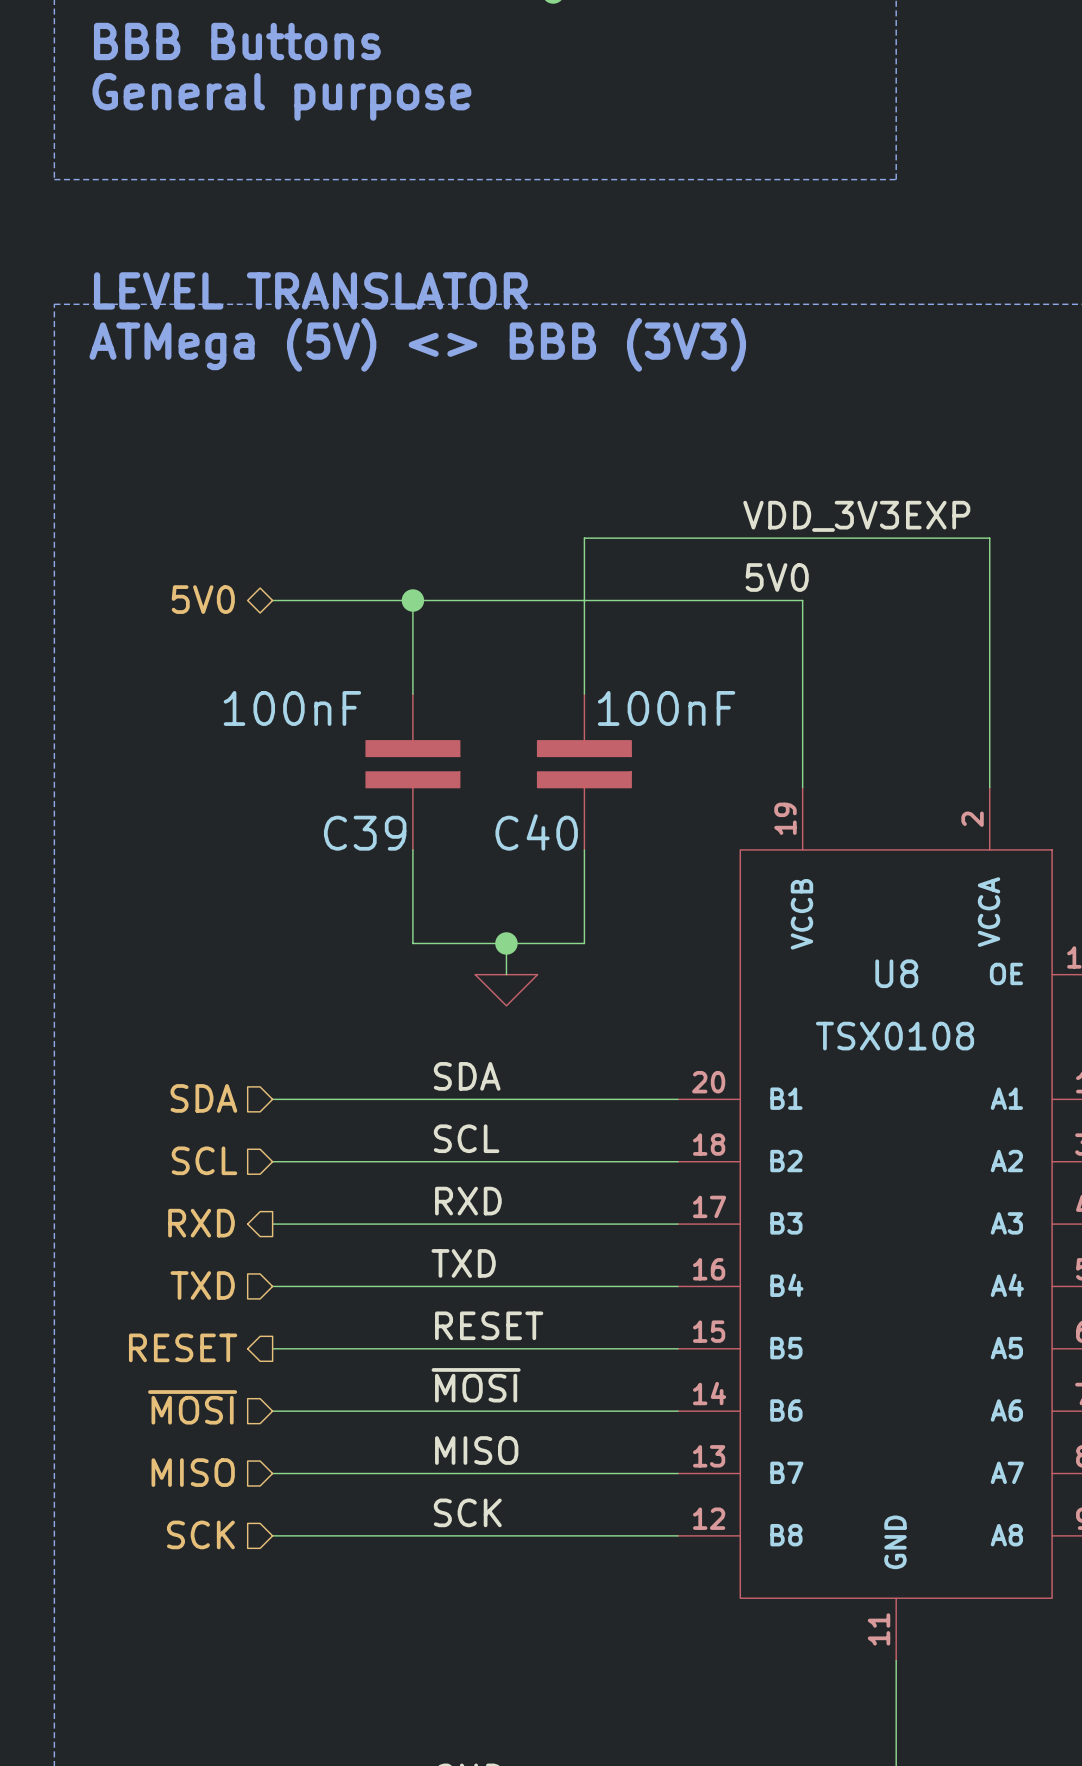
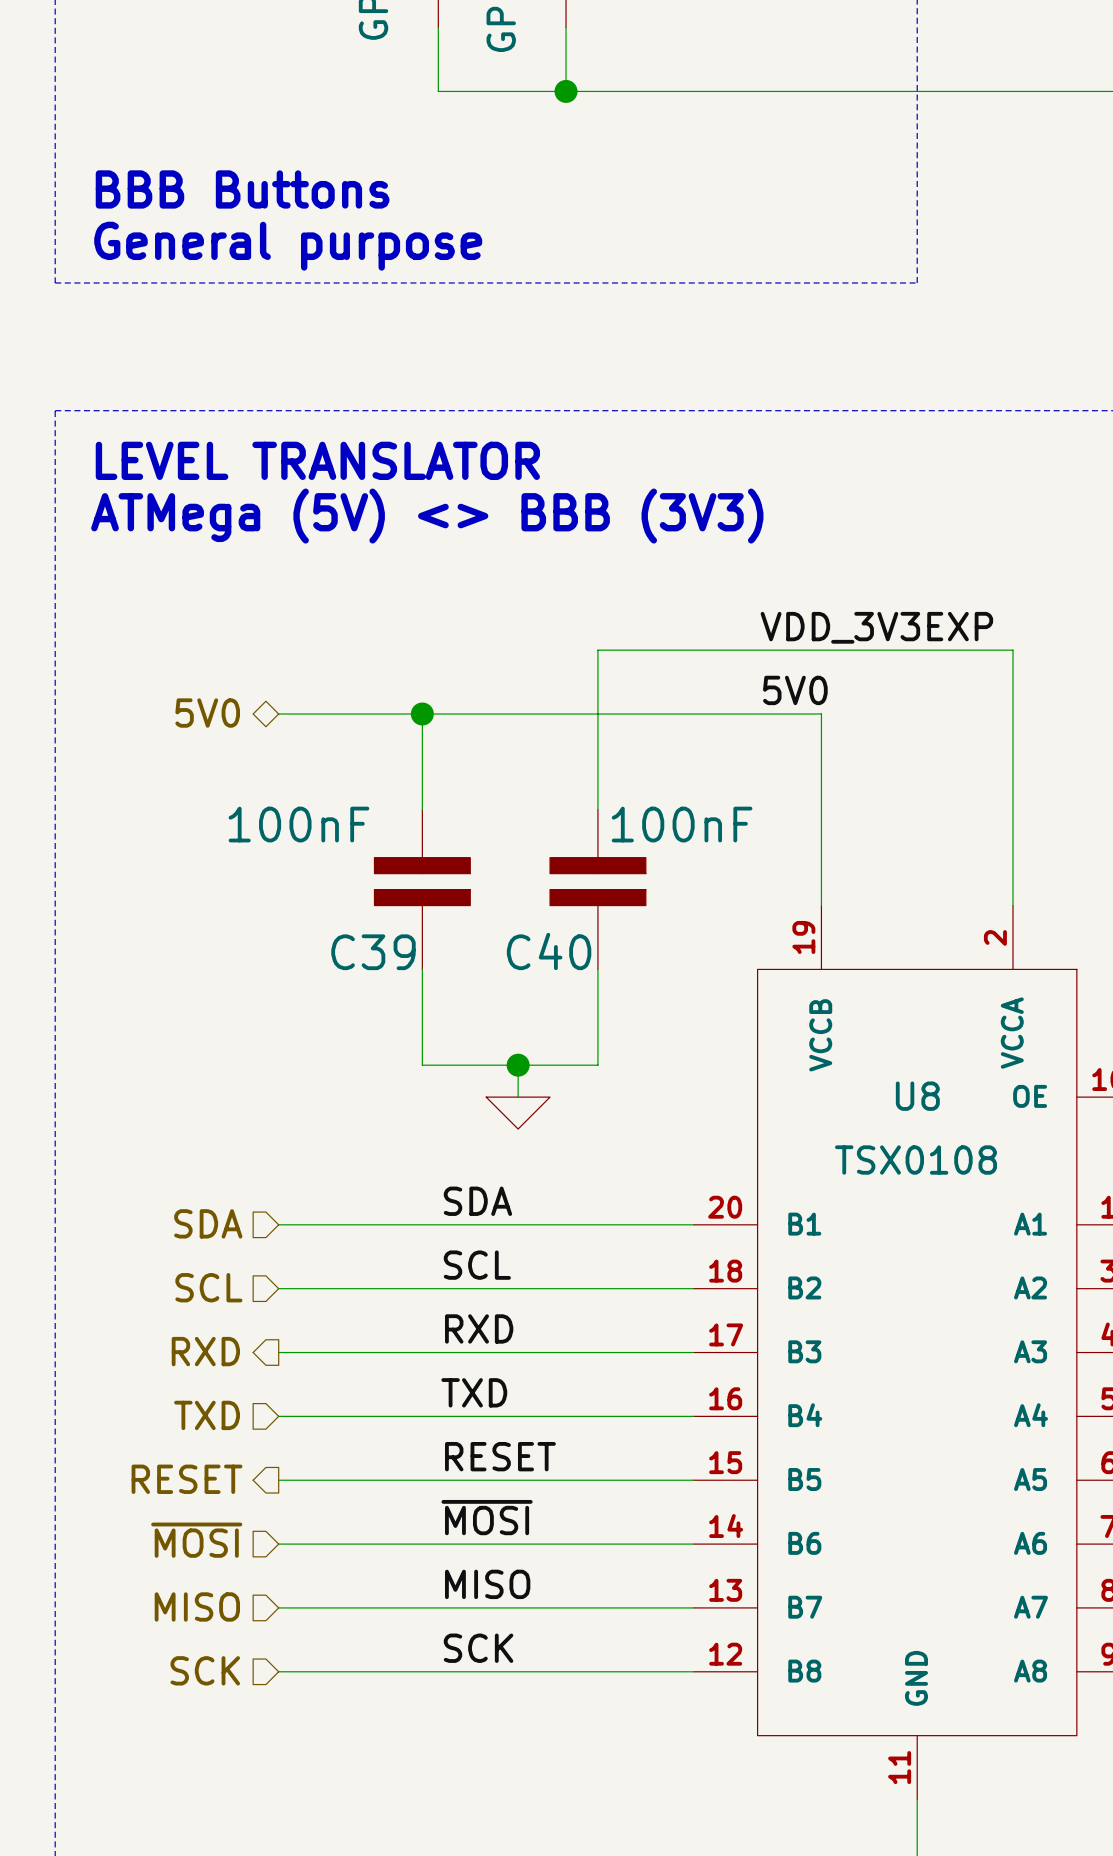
text: BBB Buttons (237, 41) -> none
text: General purpose (281, 96) -> BBB Buttons (242, 189)
text: none -> General purpose (288, 246)
text: LEVEL TRANSLATOR (310, 290) -> none
text: ATMega (5V) <> BBB (3V3) (417, 344) -> LEVEL TRANSLATOR (317, 460)
text: none -> ATMega (5V) <> BBB (3V3) (427, 516)

